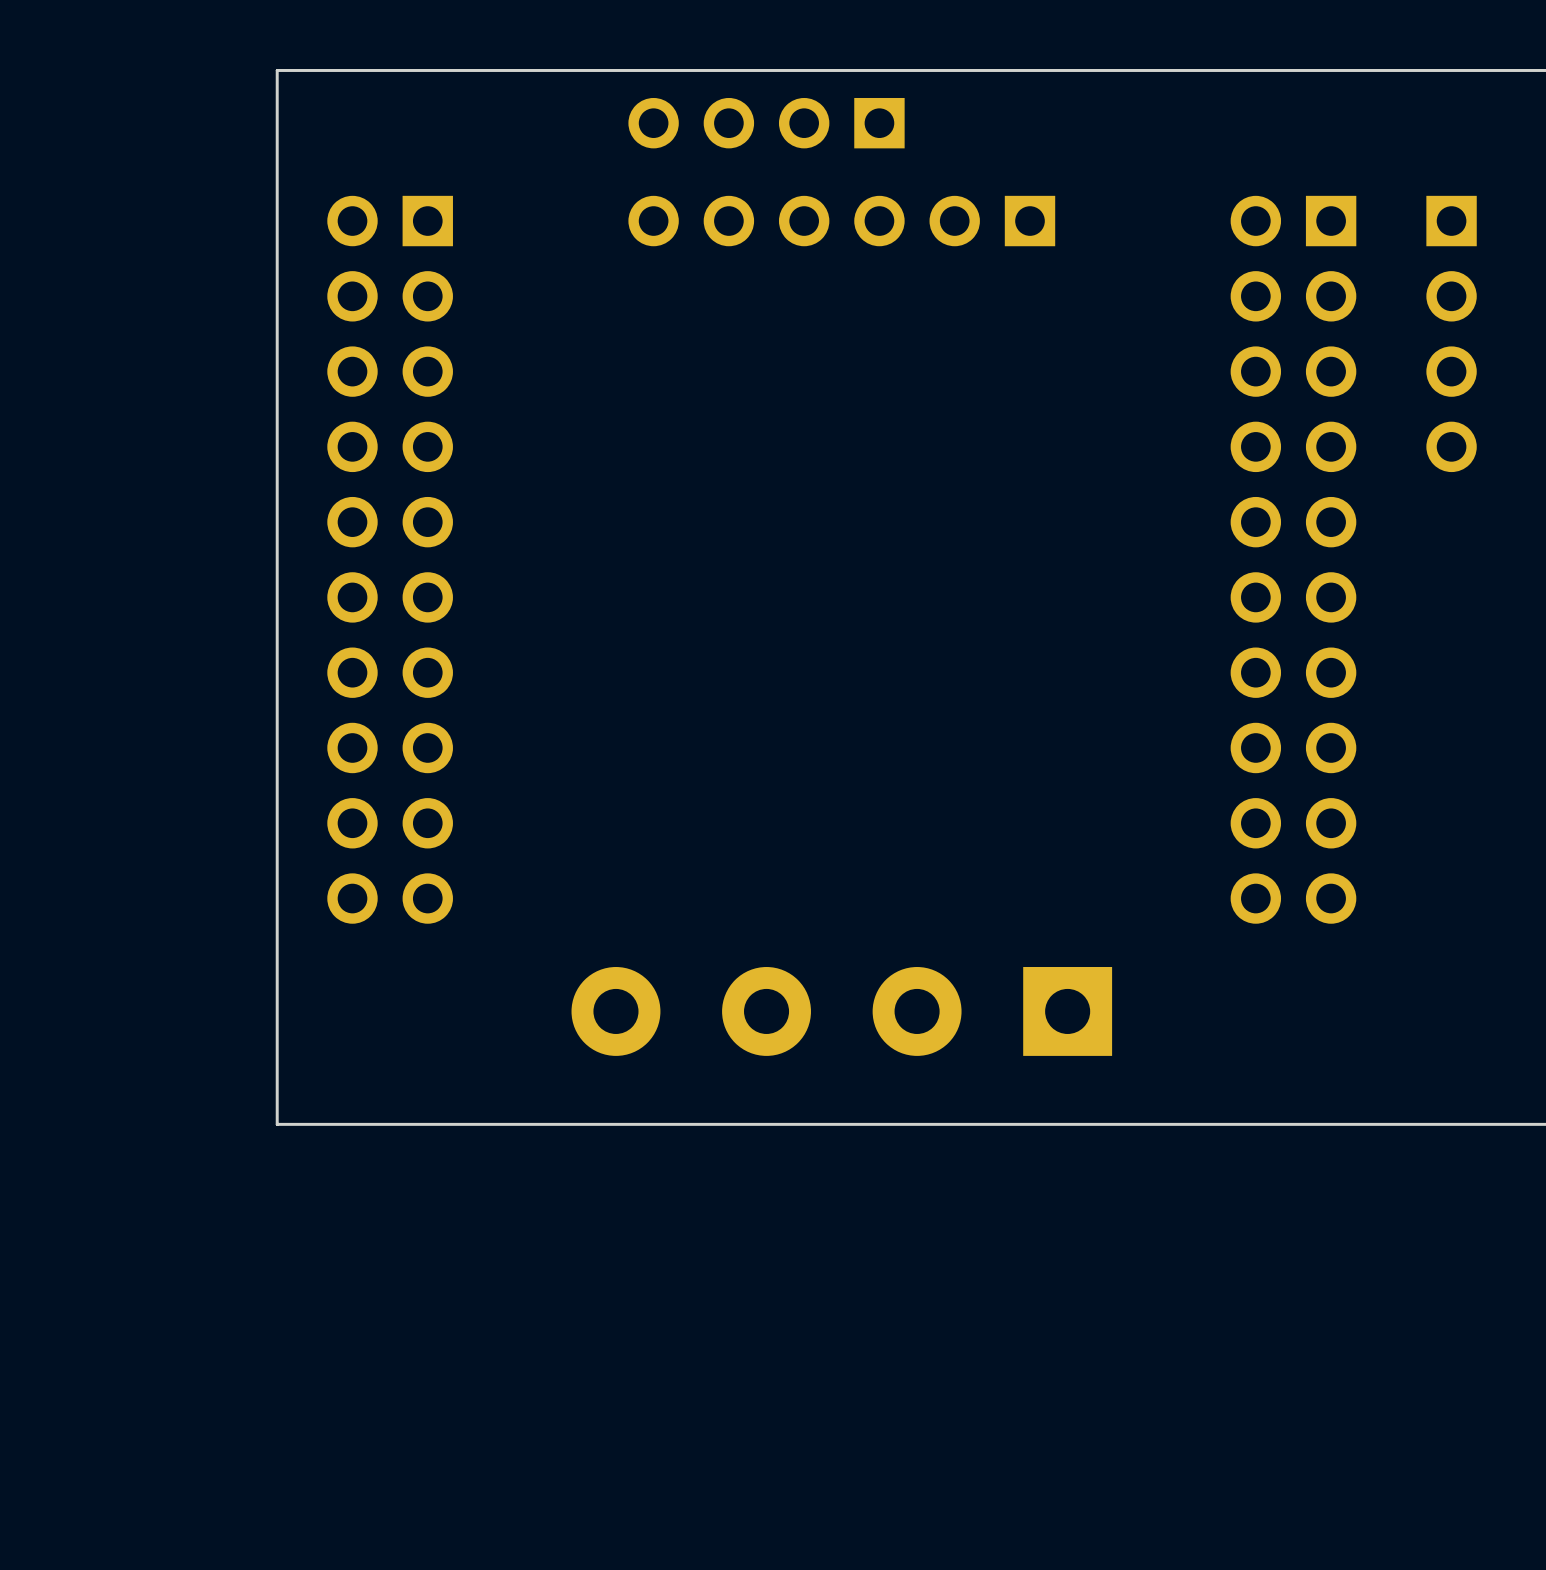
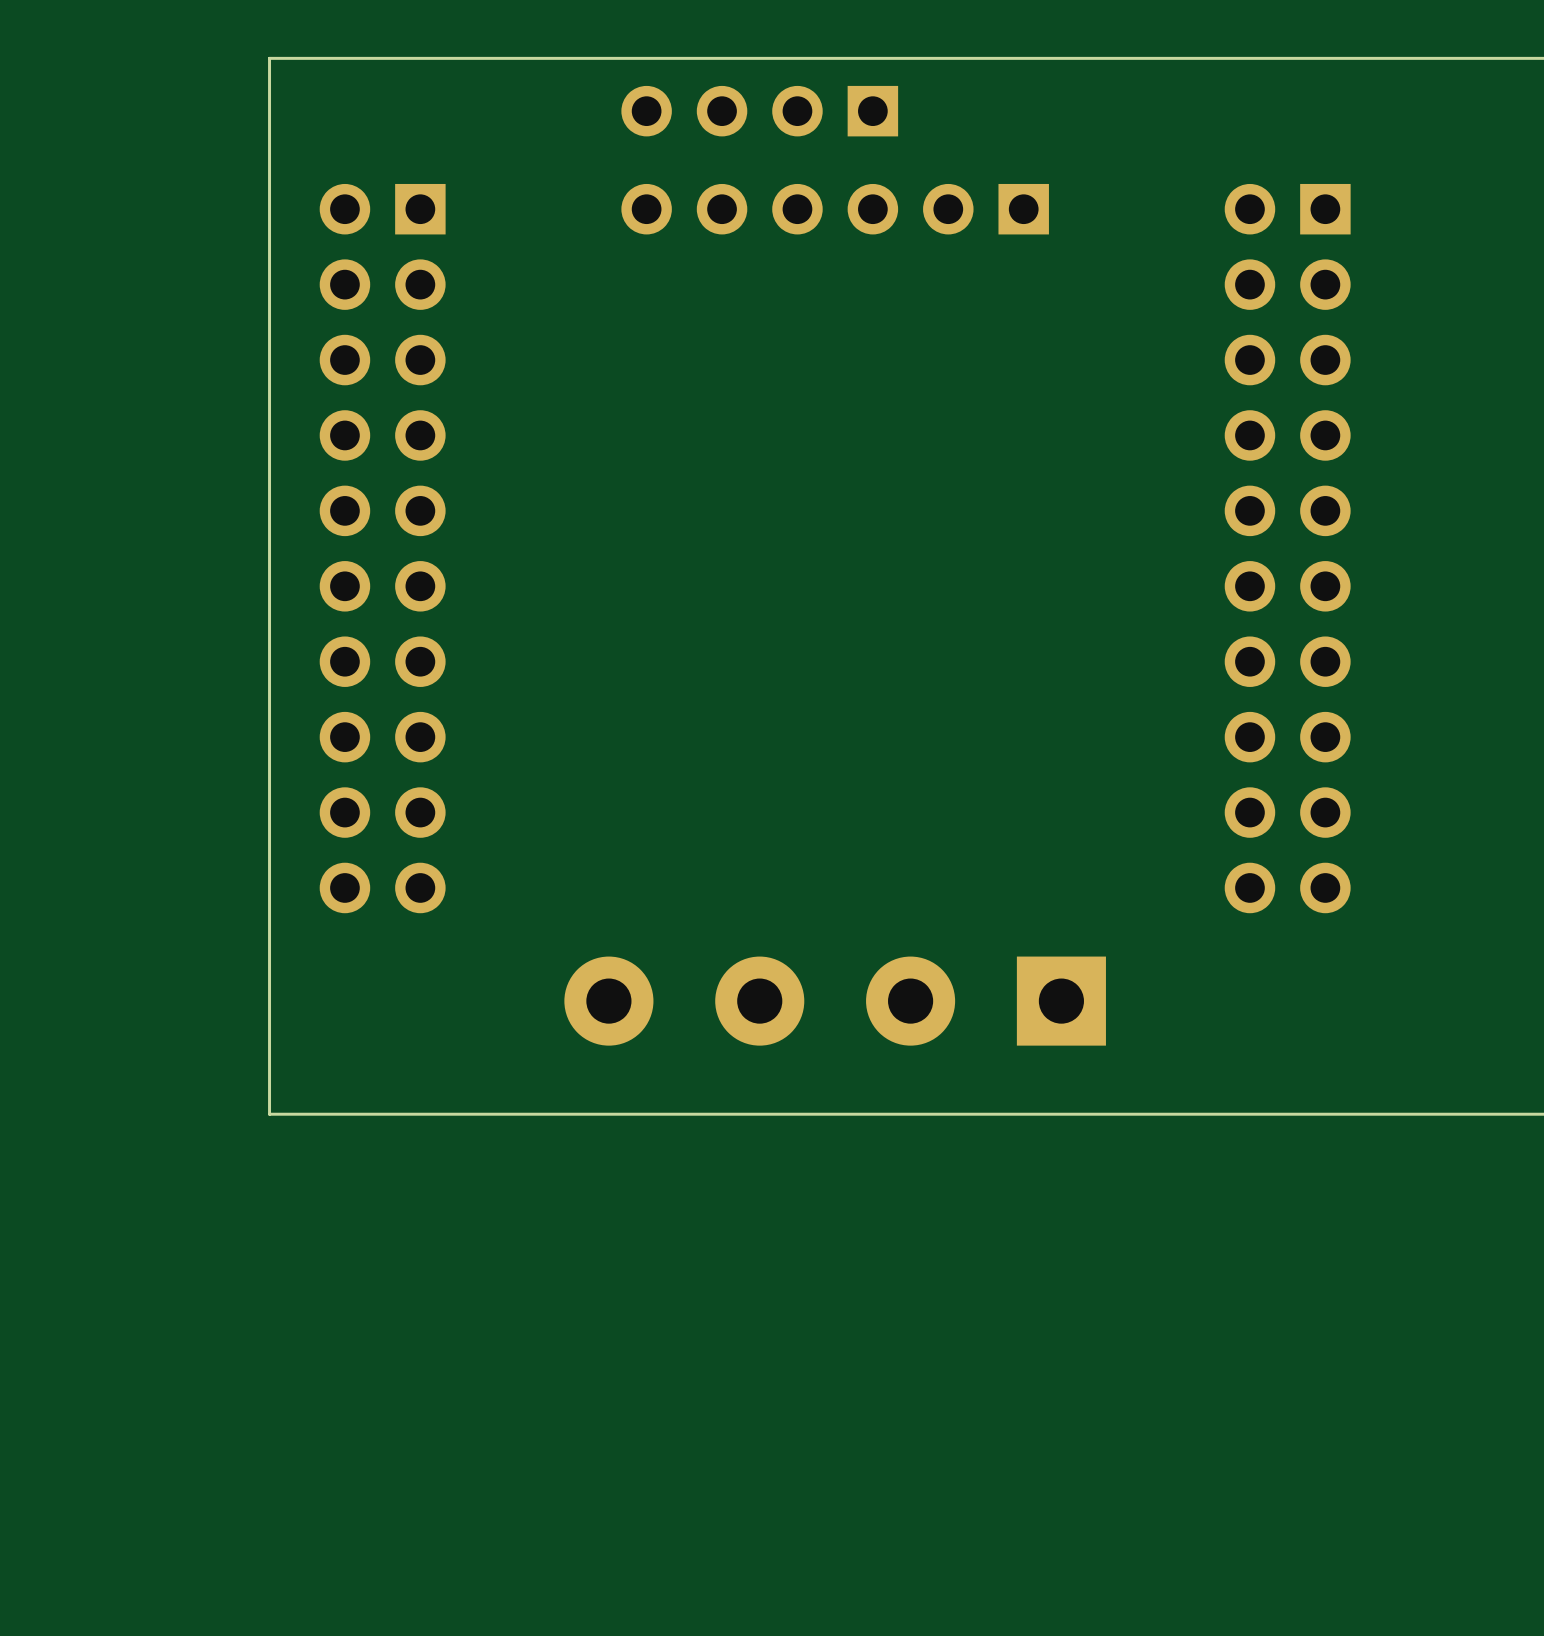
part: (1451, 333) -> none

